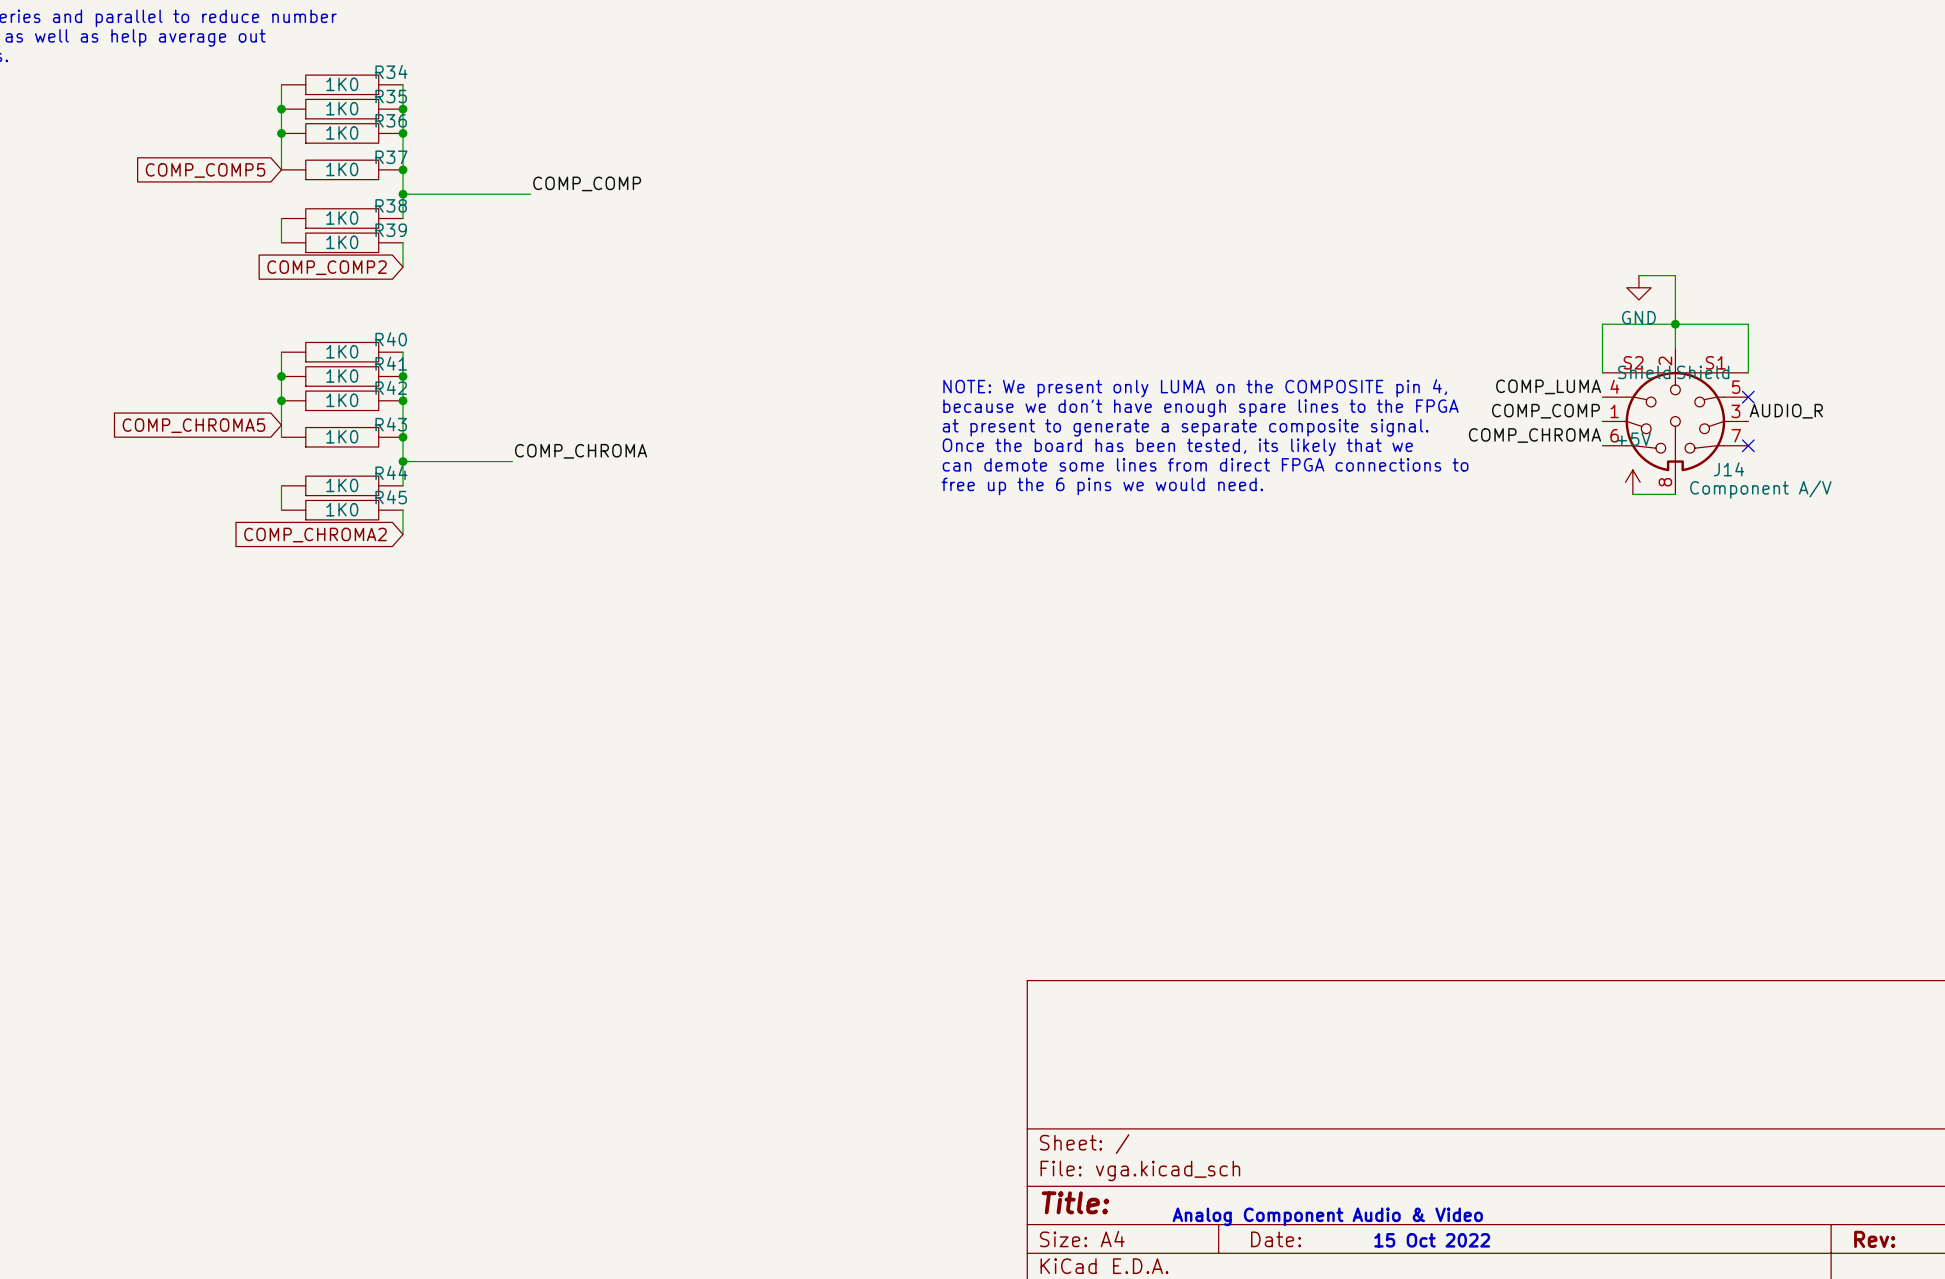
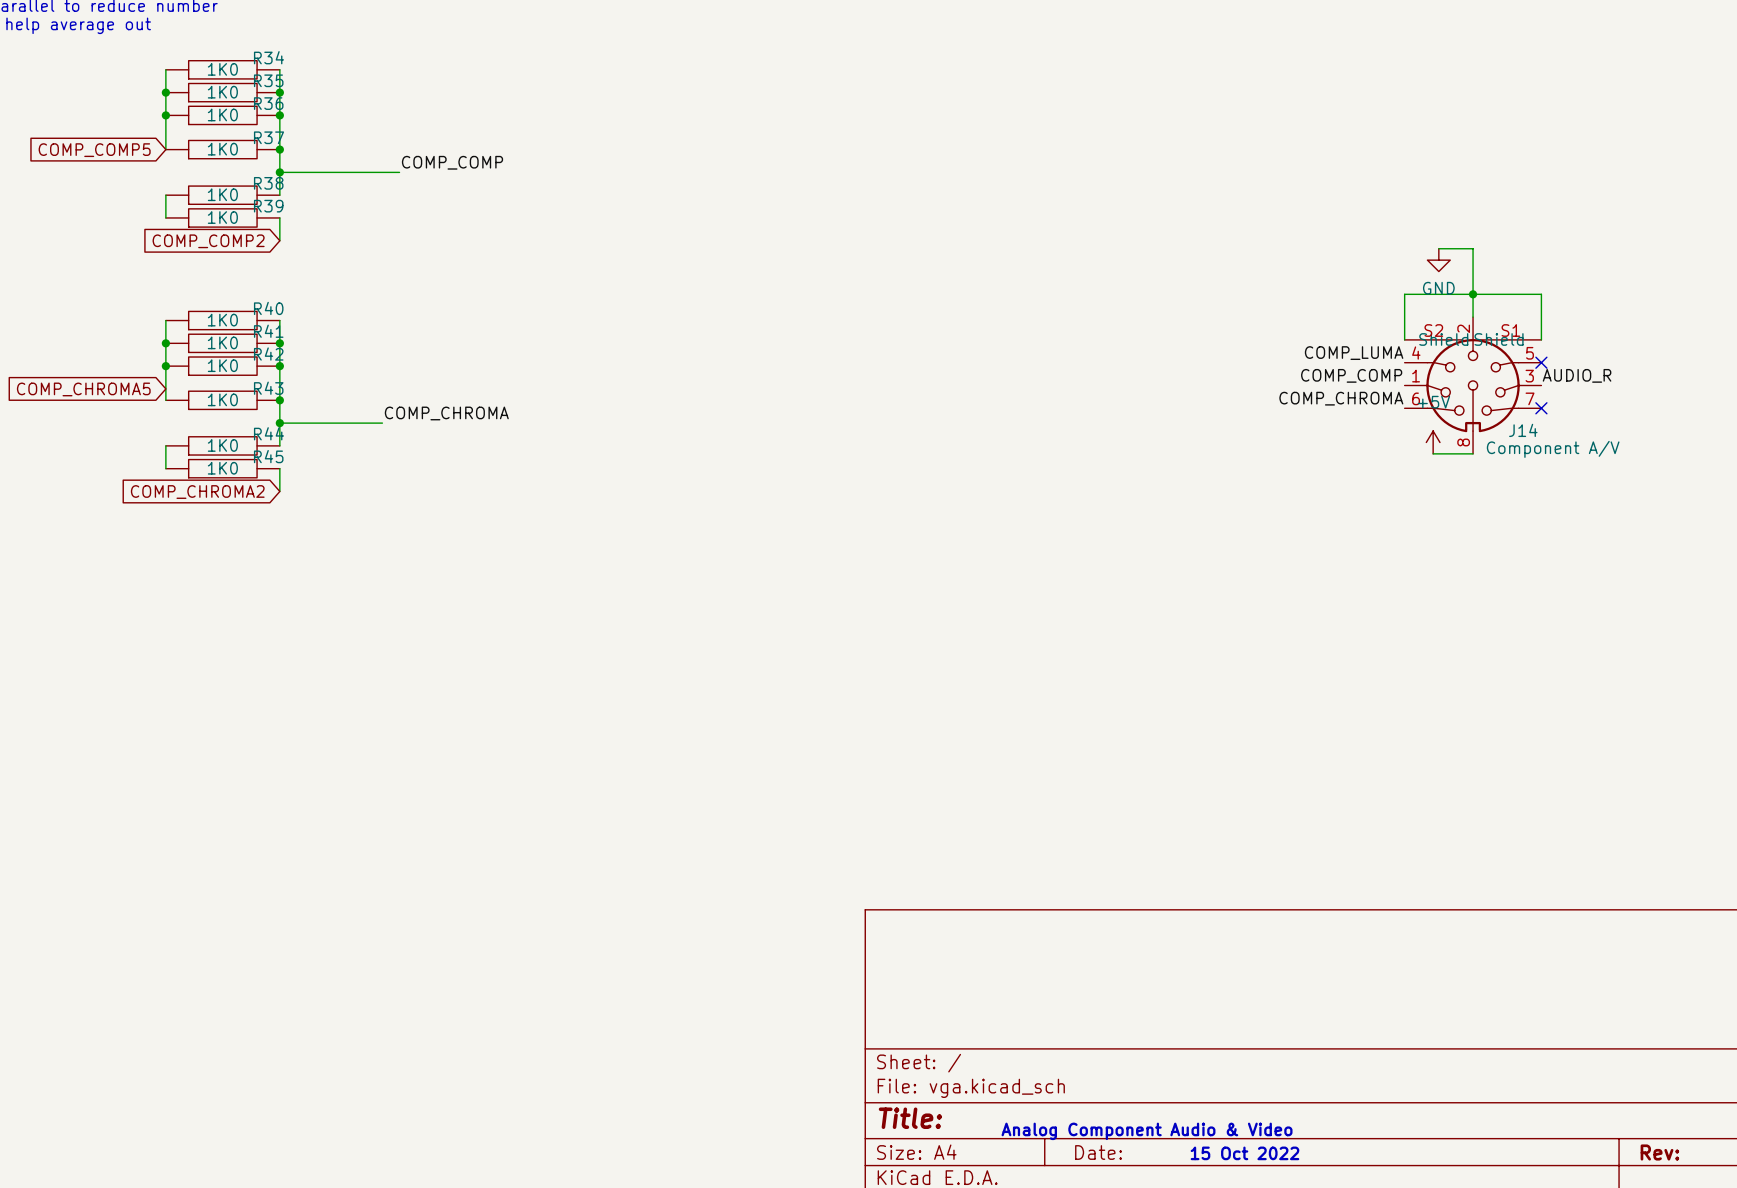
text: NOTE: We present only LUMA on the COMPOSITE pin 4, (1195, 388) -> none
text: because we don't have enough spare lines to the FPGA (1200, 408) -> none
text: at present to generate a separate composite signal. (1185, 427) -> none
text: Once the board has been tested, its likely that we (1177, 447) -> none
text: can demote some lines from direct FPGA connections to (1205, 464) -> none
text: free up the 6 pins we would need. (1102, 486) -> none

